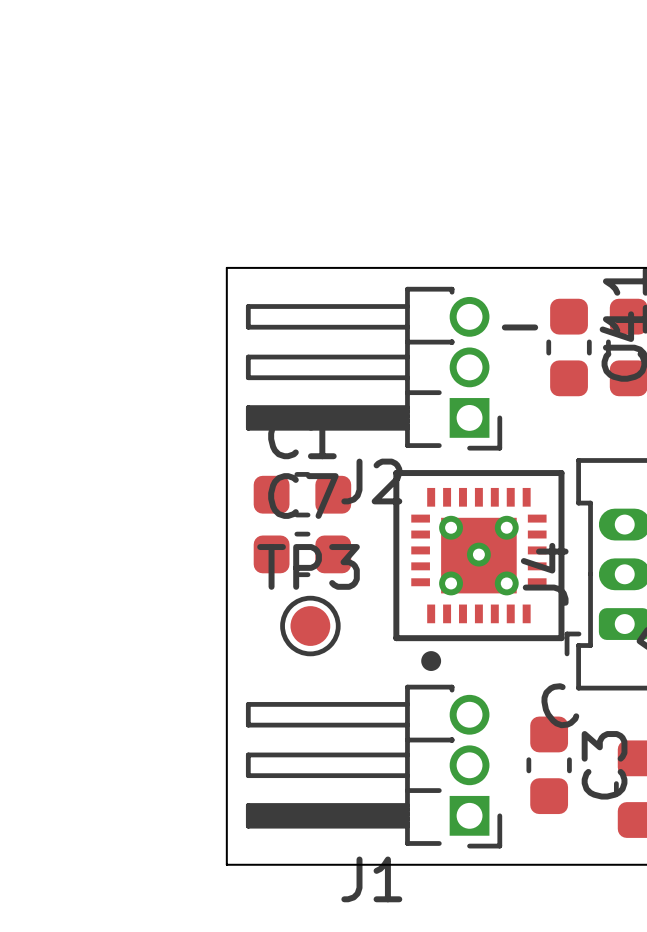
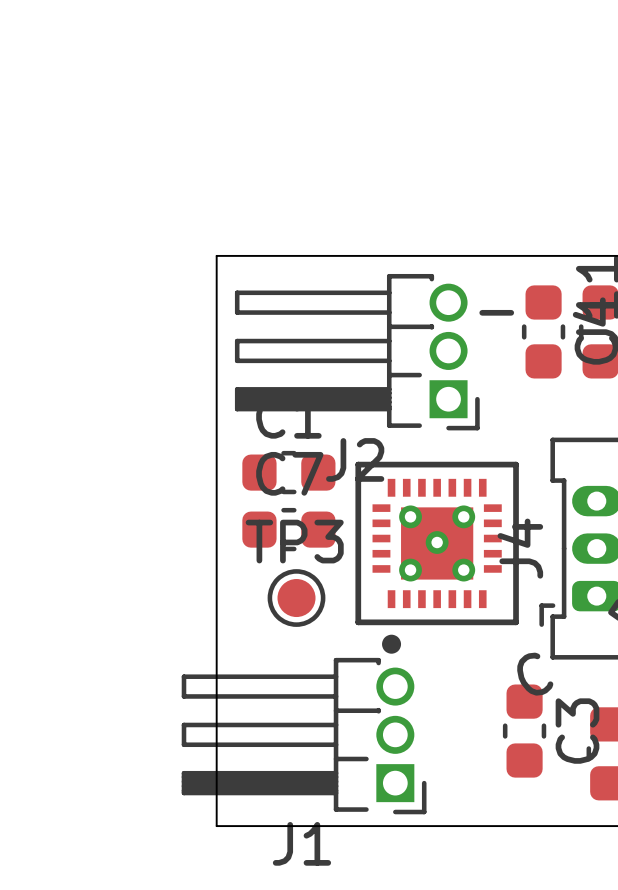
part position: (478, 570) -> (437, 557)
J1 position: (374, 766) -> (304, 736)

